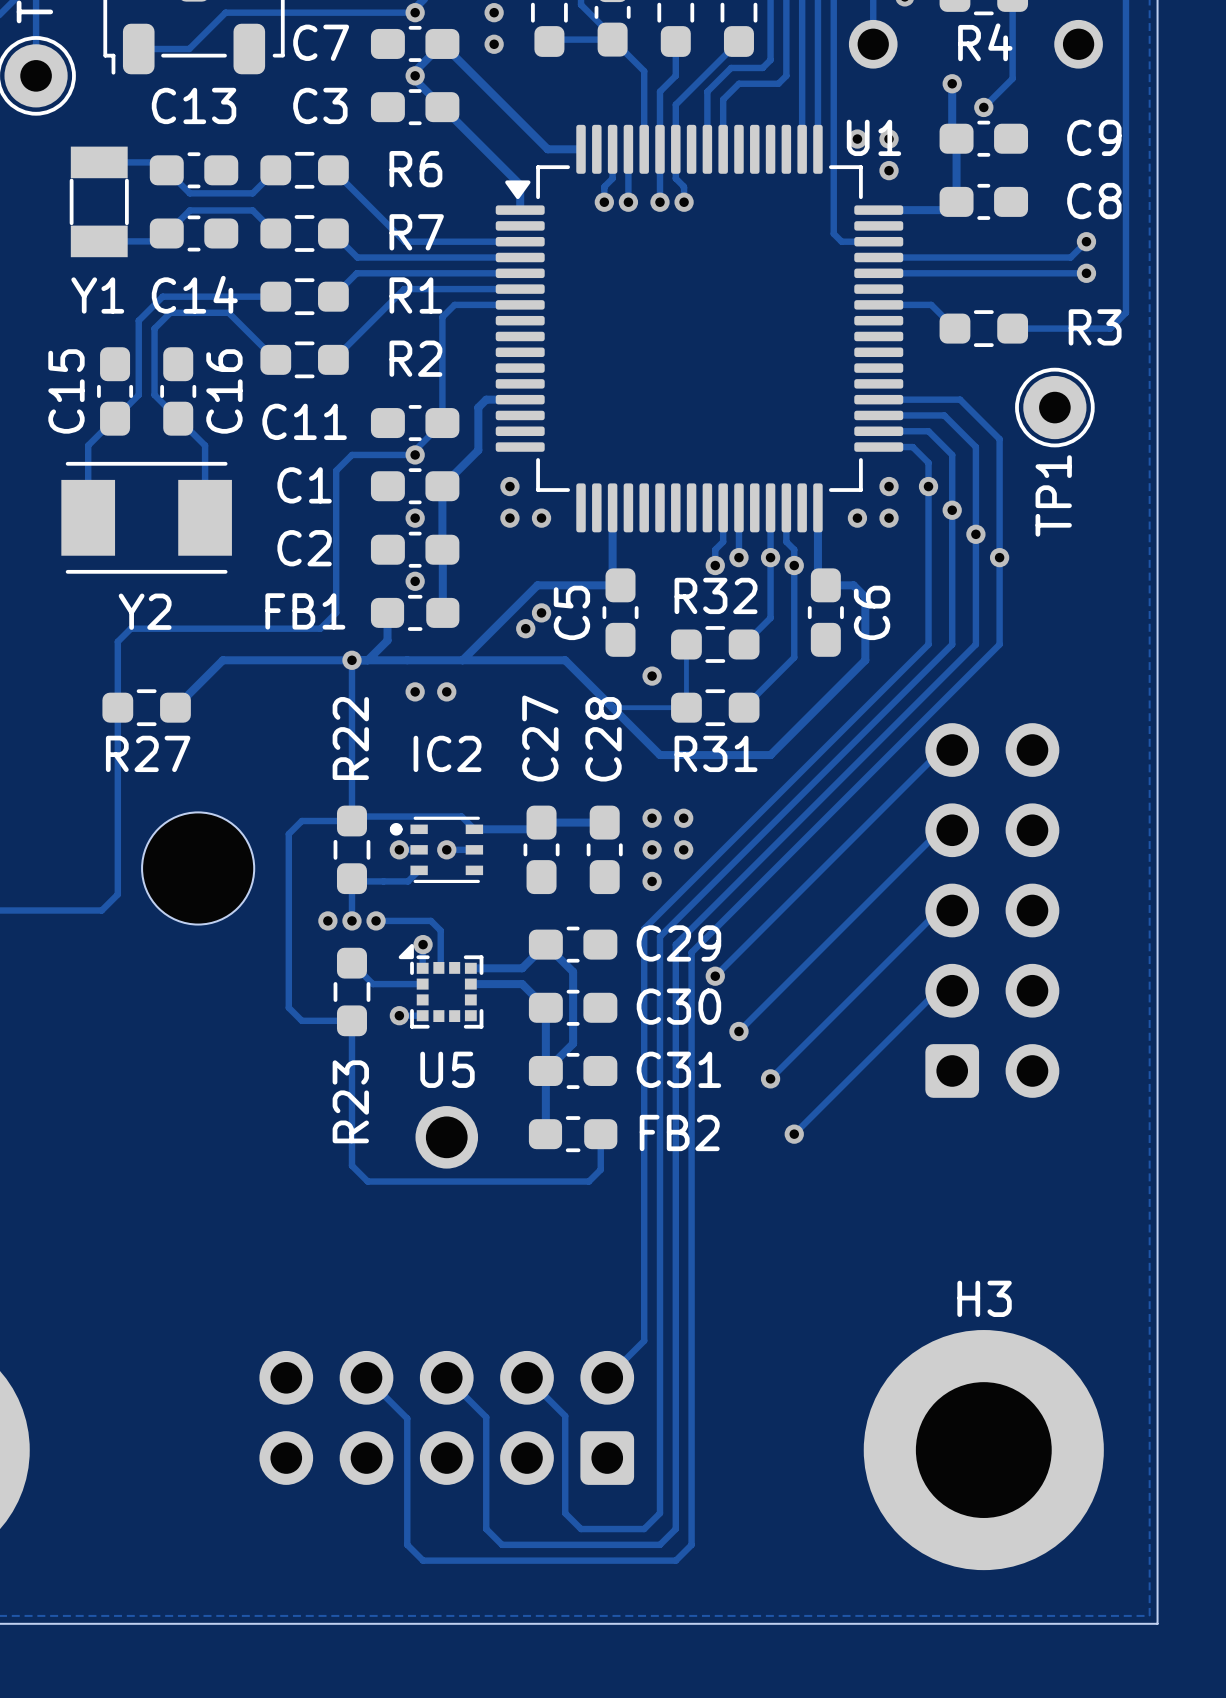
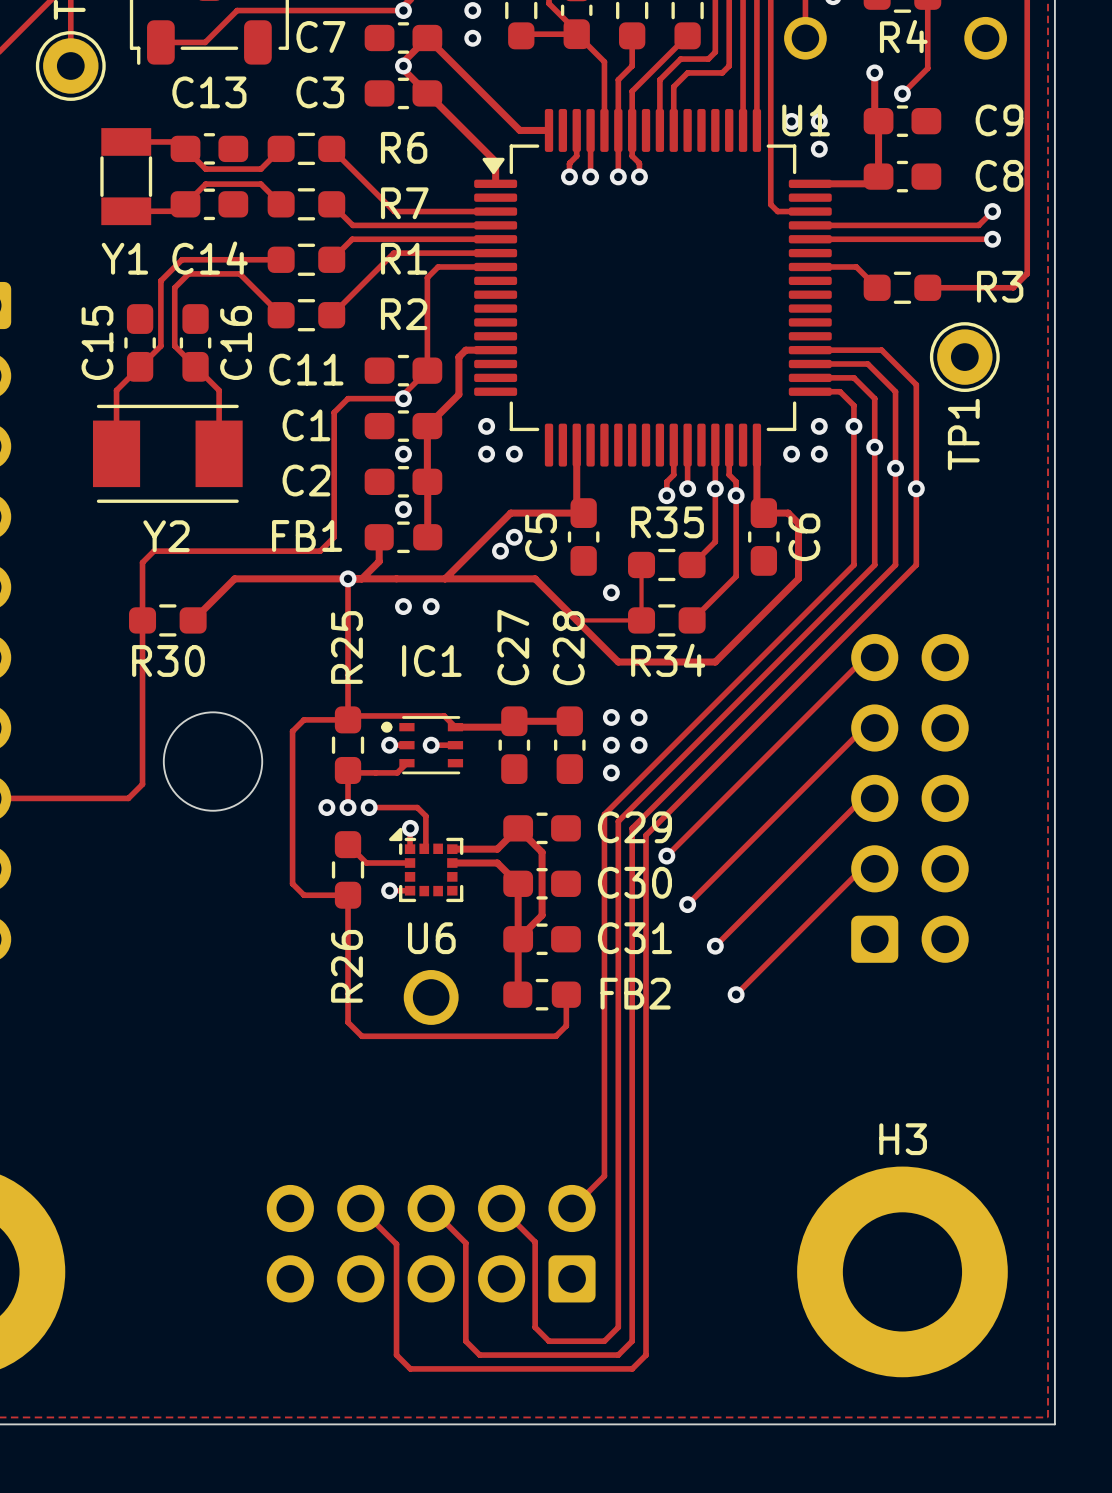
R32 name: R32 (716, 595) -> R35 (667, 522)
R22 name: R22 (350, 738) -> R25 (346, 647)
R27 name: R27 (148, 753) -> R30 (168, 660)
IC2 name: IC2 (447, 753) -> IC1 (431, 660)
R31 name: R31 (716, 753) -> R34 (668, 660)
U5 name: U5 (447, 1069) -> U6 (431, 938)
R23 name: R23 (350, 1101) -> R26 (346, 966)

